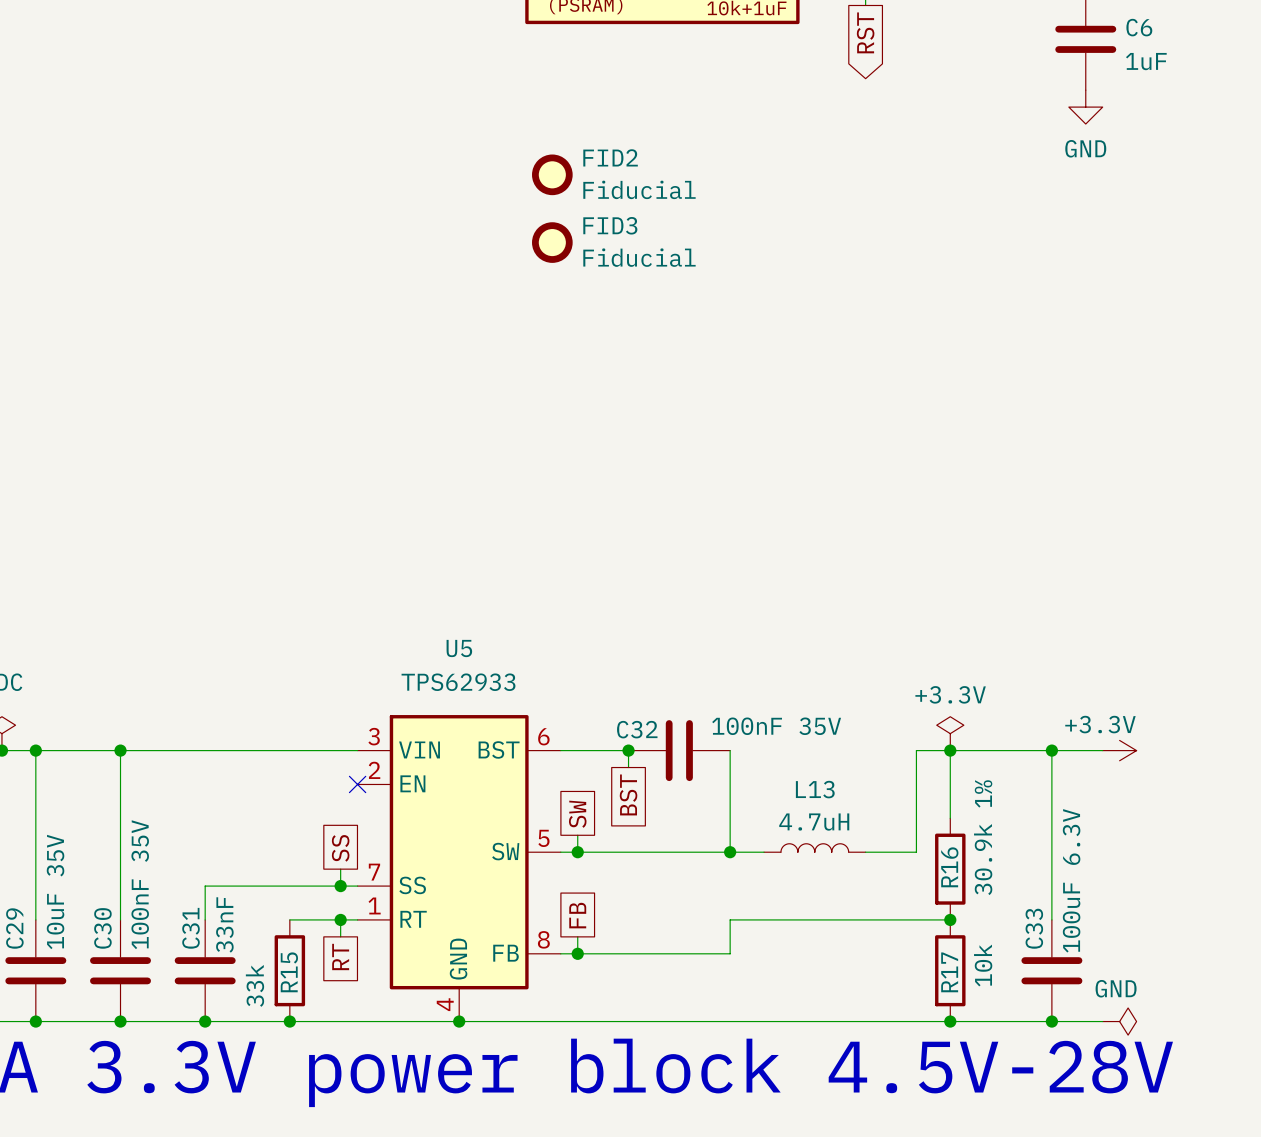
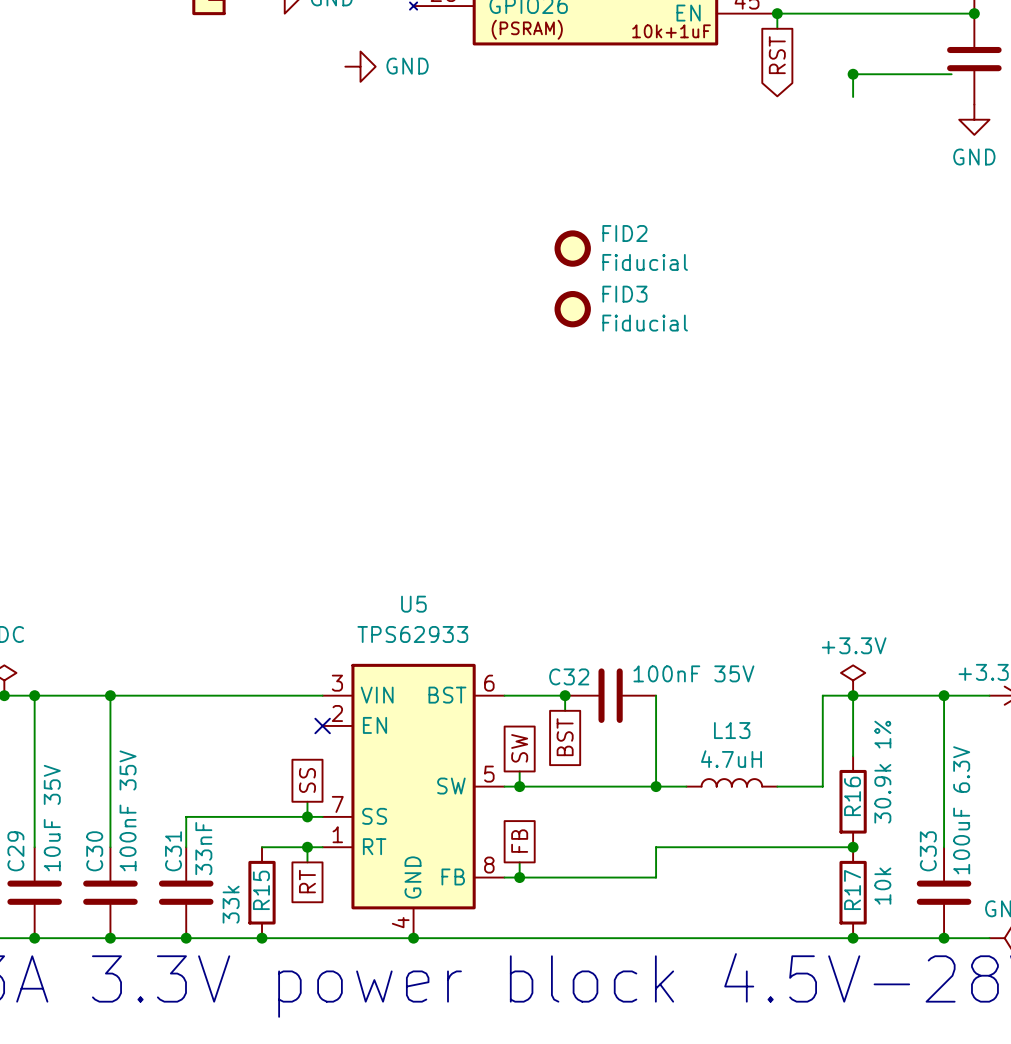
power symbol: none -> GND (360, 66)
junction: none -> (853, 74)
wire: none -> (951, 74) (853, 74) (853, 96)
FID2 position: (552, 174) -> (572, 248)
FID3 position: (552, 242) -> (572, 309)

